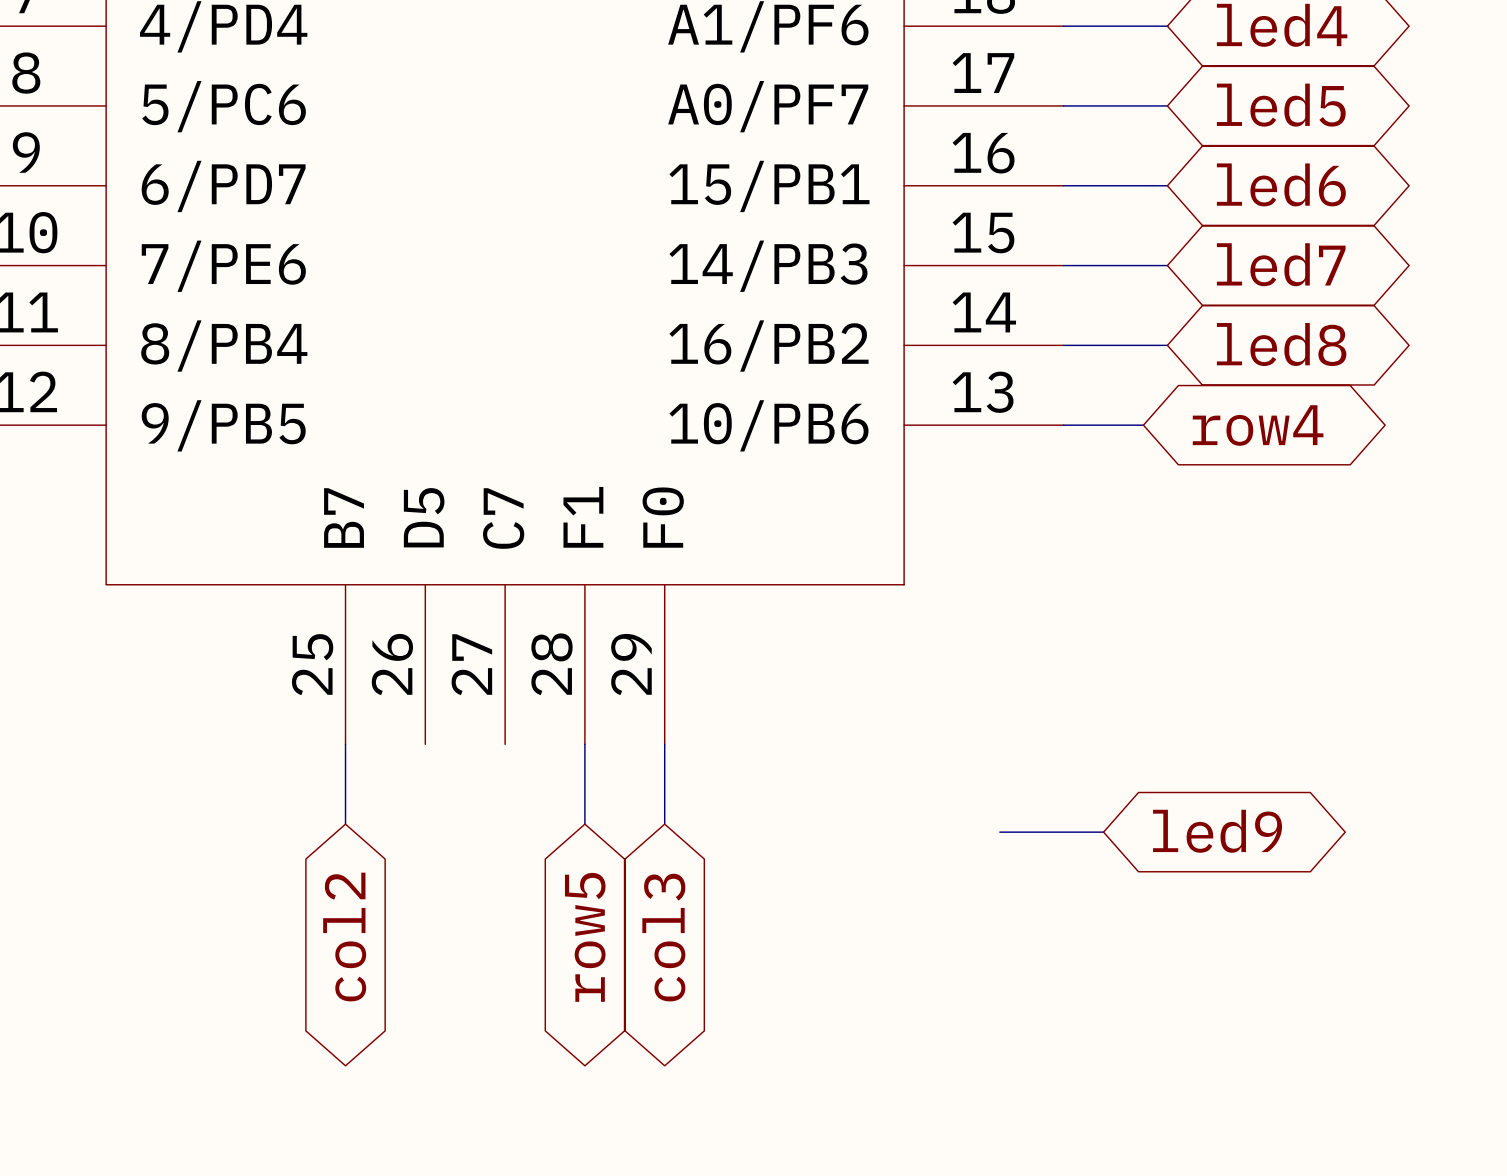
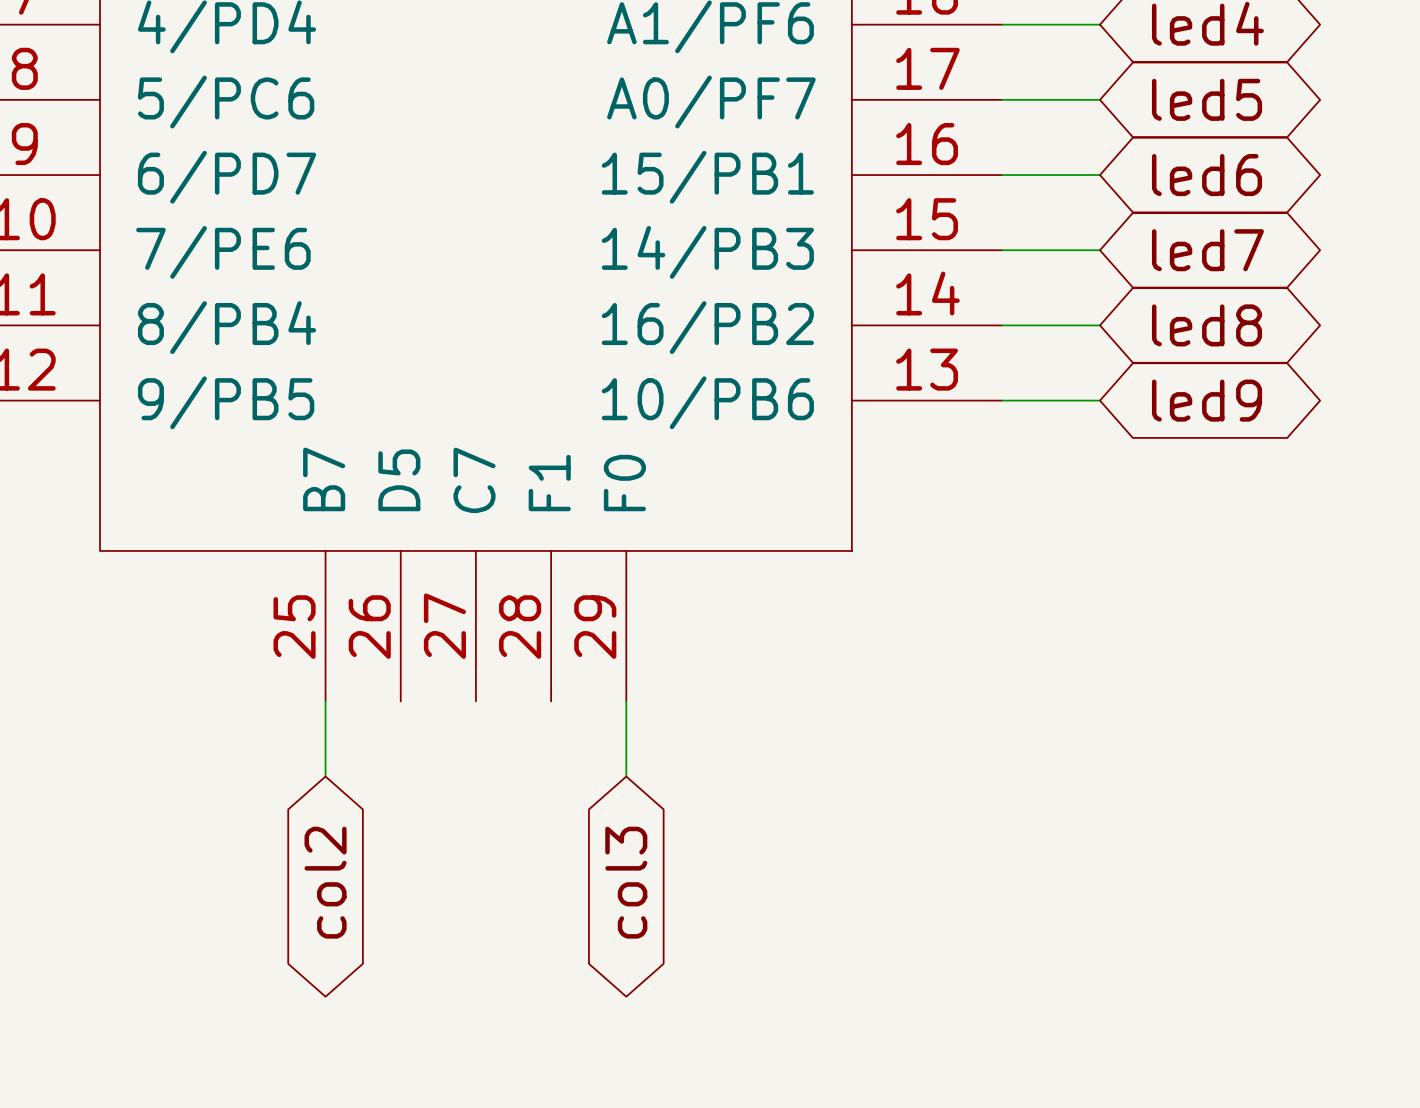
wire: none -> (1077, 400) (1099, 400)
global label: row4 (1258, 425) -> led9 (1207, 400)
wire: (584, 744) (584, 824) -> none
global label: led9 (1217, 831) -> none
wire: (999, 832) (1103, 832) -> none
global label: row5 (585, 937) -> none

